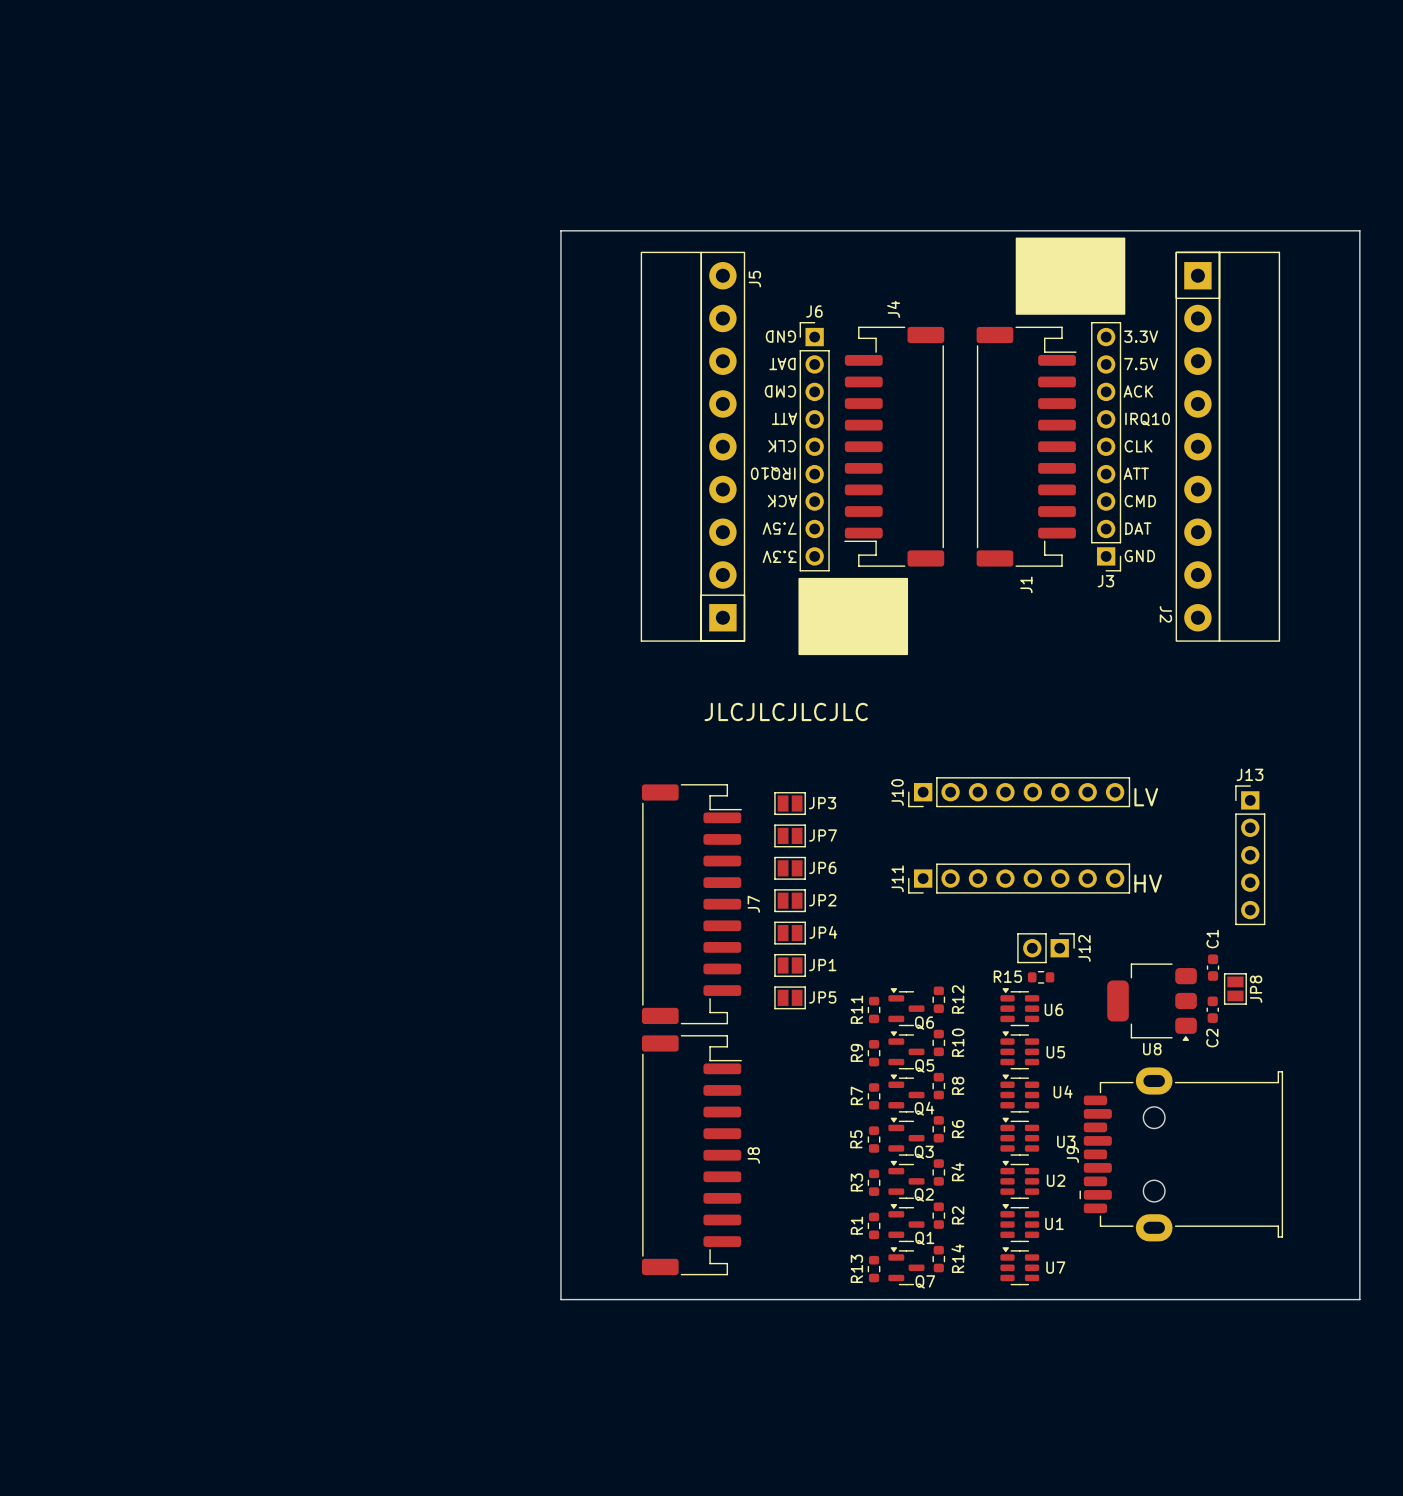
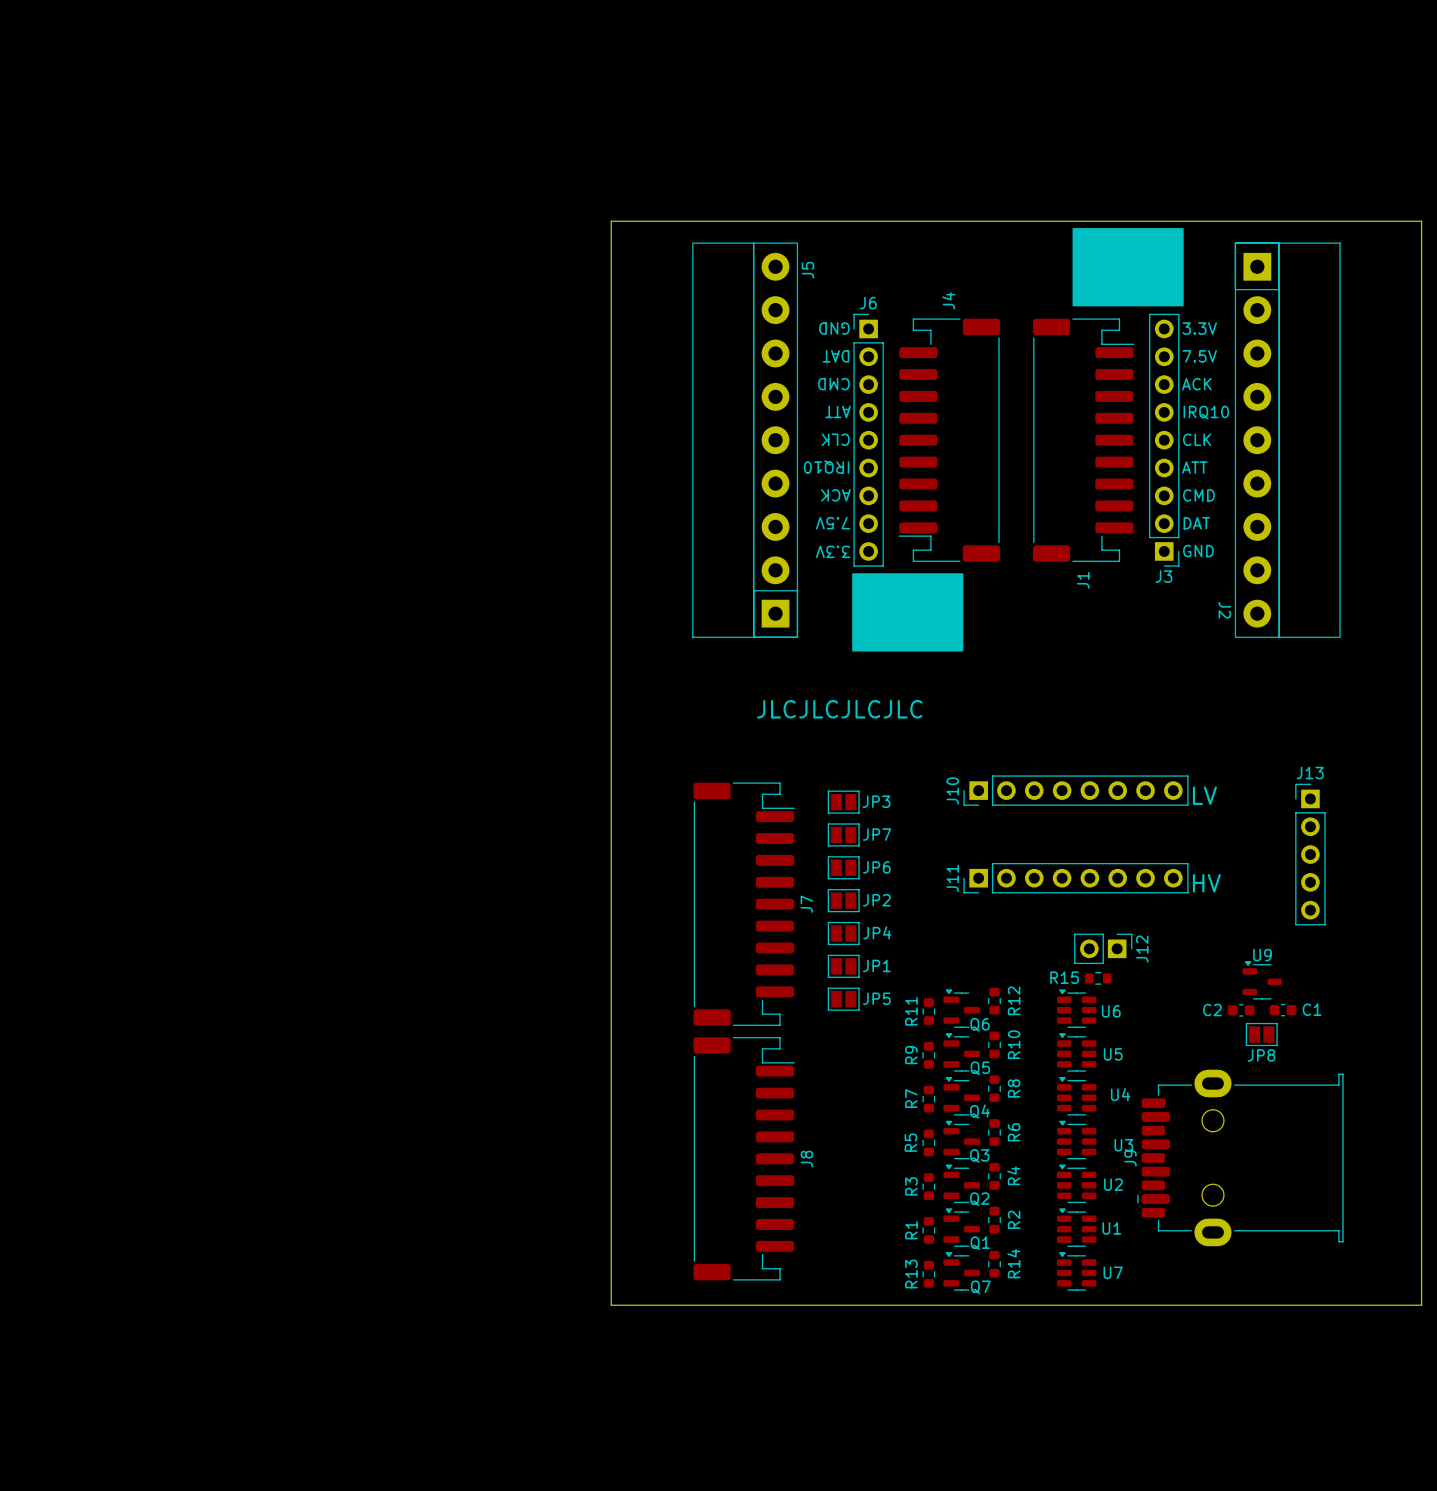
C1 rotation: 0° (1213, 967) -> 90° clockwise (1283, 1010)
C1 position: (1213, 967) -> (1283, 1010)
U9: none -> (1262, 980)
JP8 rotation: 0° (1235, 988) -> 90° clockwise (1261, 1034)
JP8 position: (1235, 988) -> (1261, 1034)
U8: (1152, 1002) -> none
C2 rotation: 0° (1212, 1009) -> 90° clockwise (1241, 1010)
C2 position: (1212, 1009) -> (1241, 1010)

